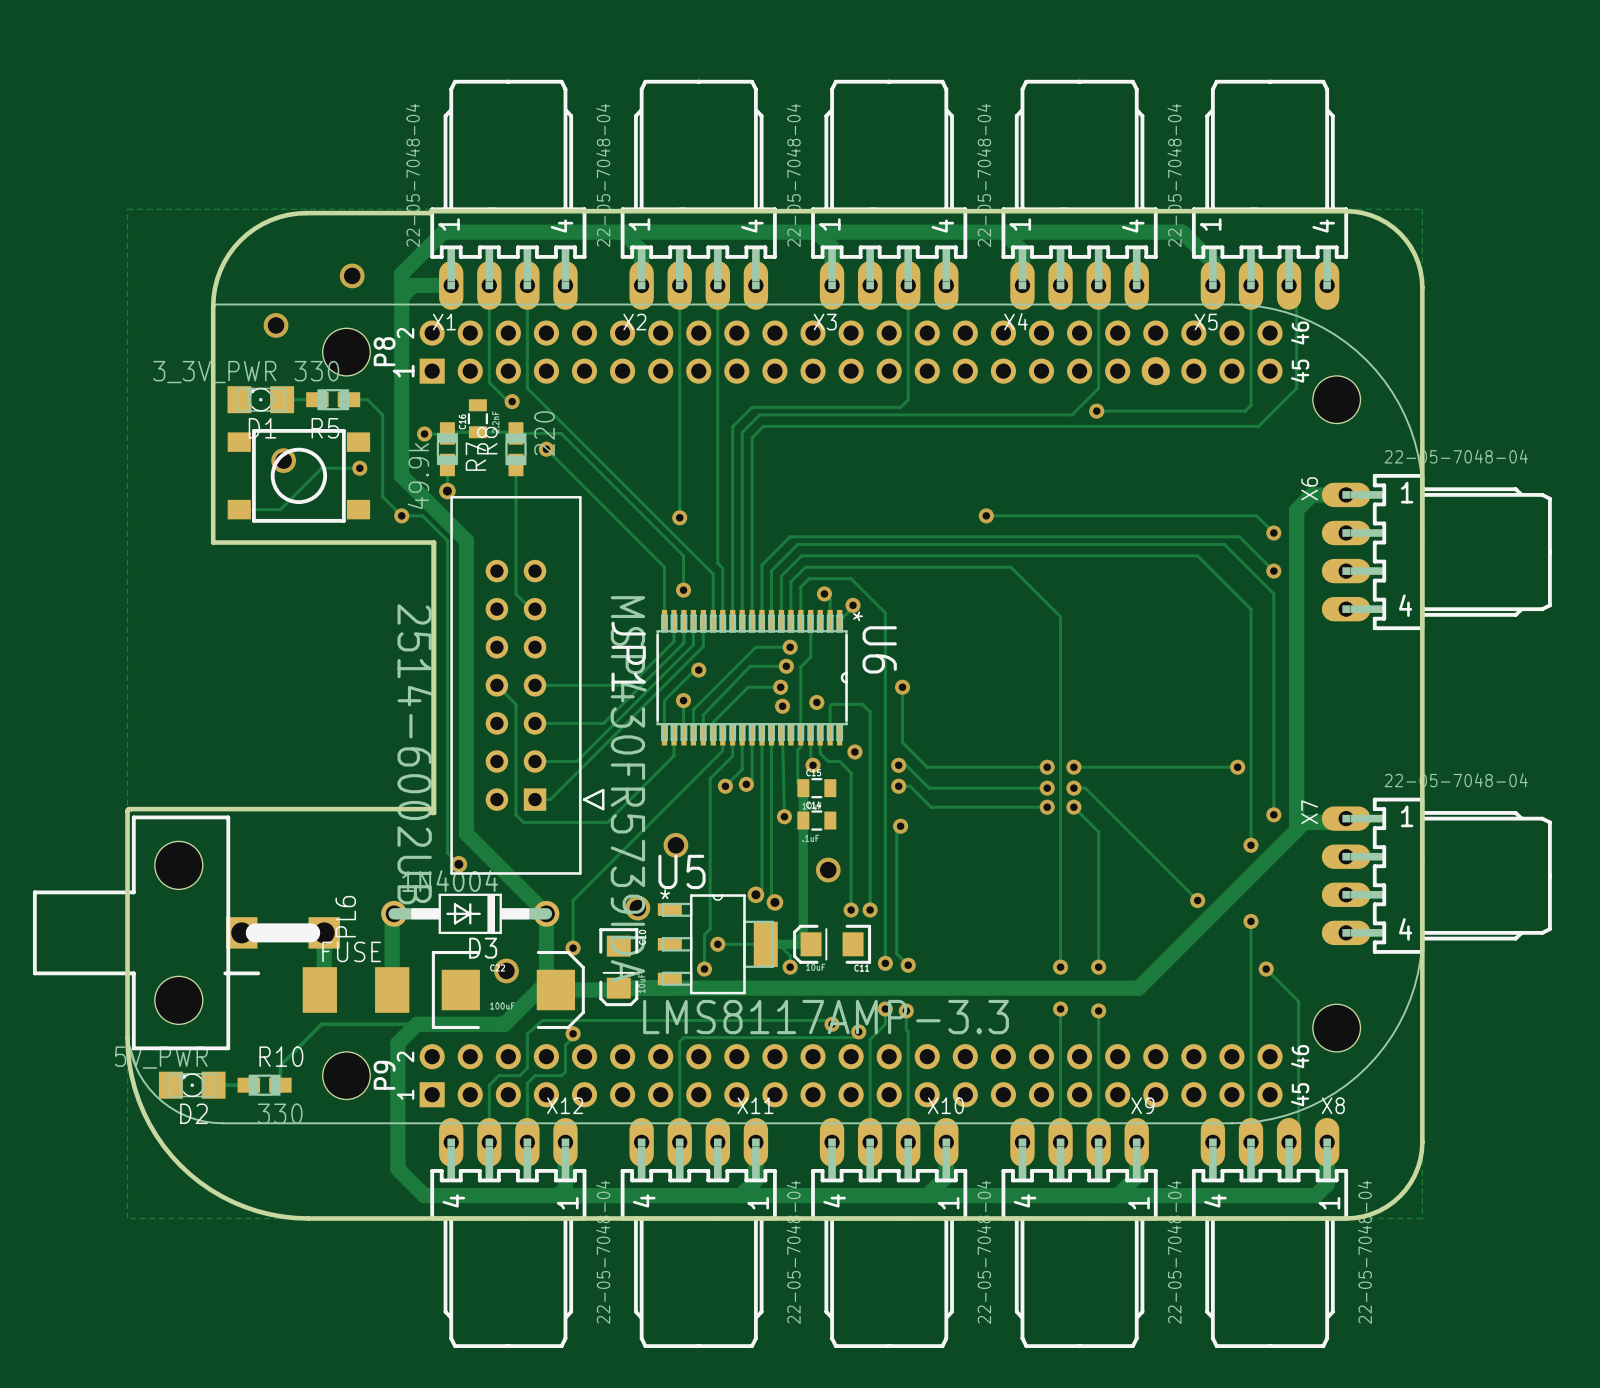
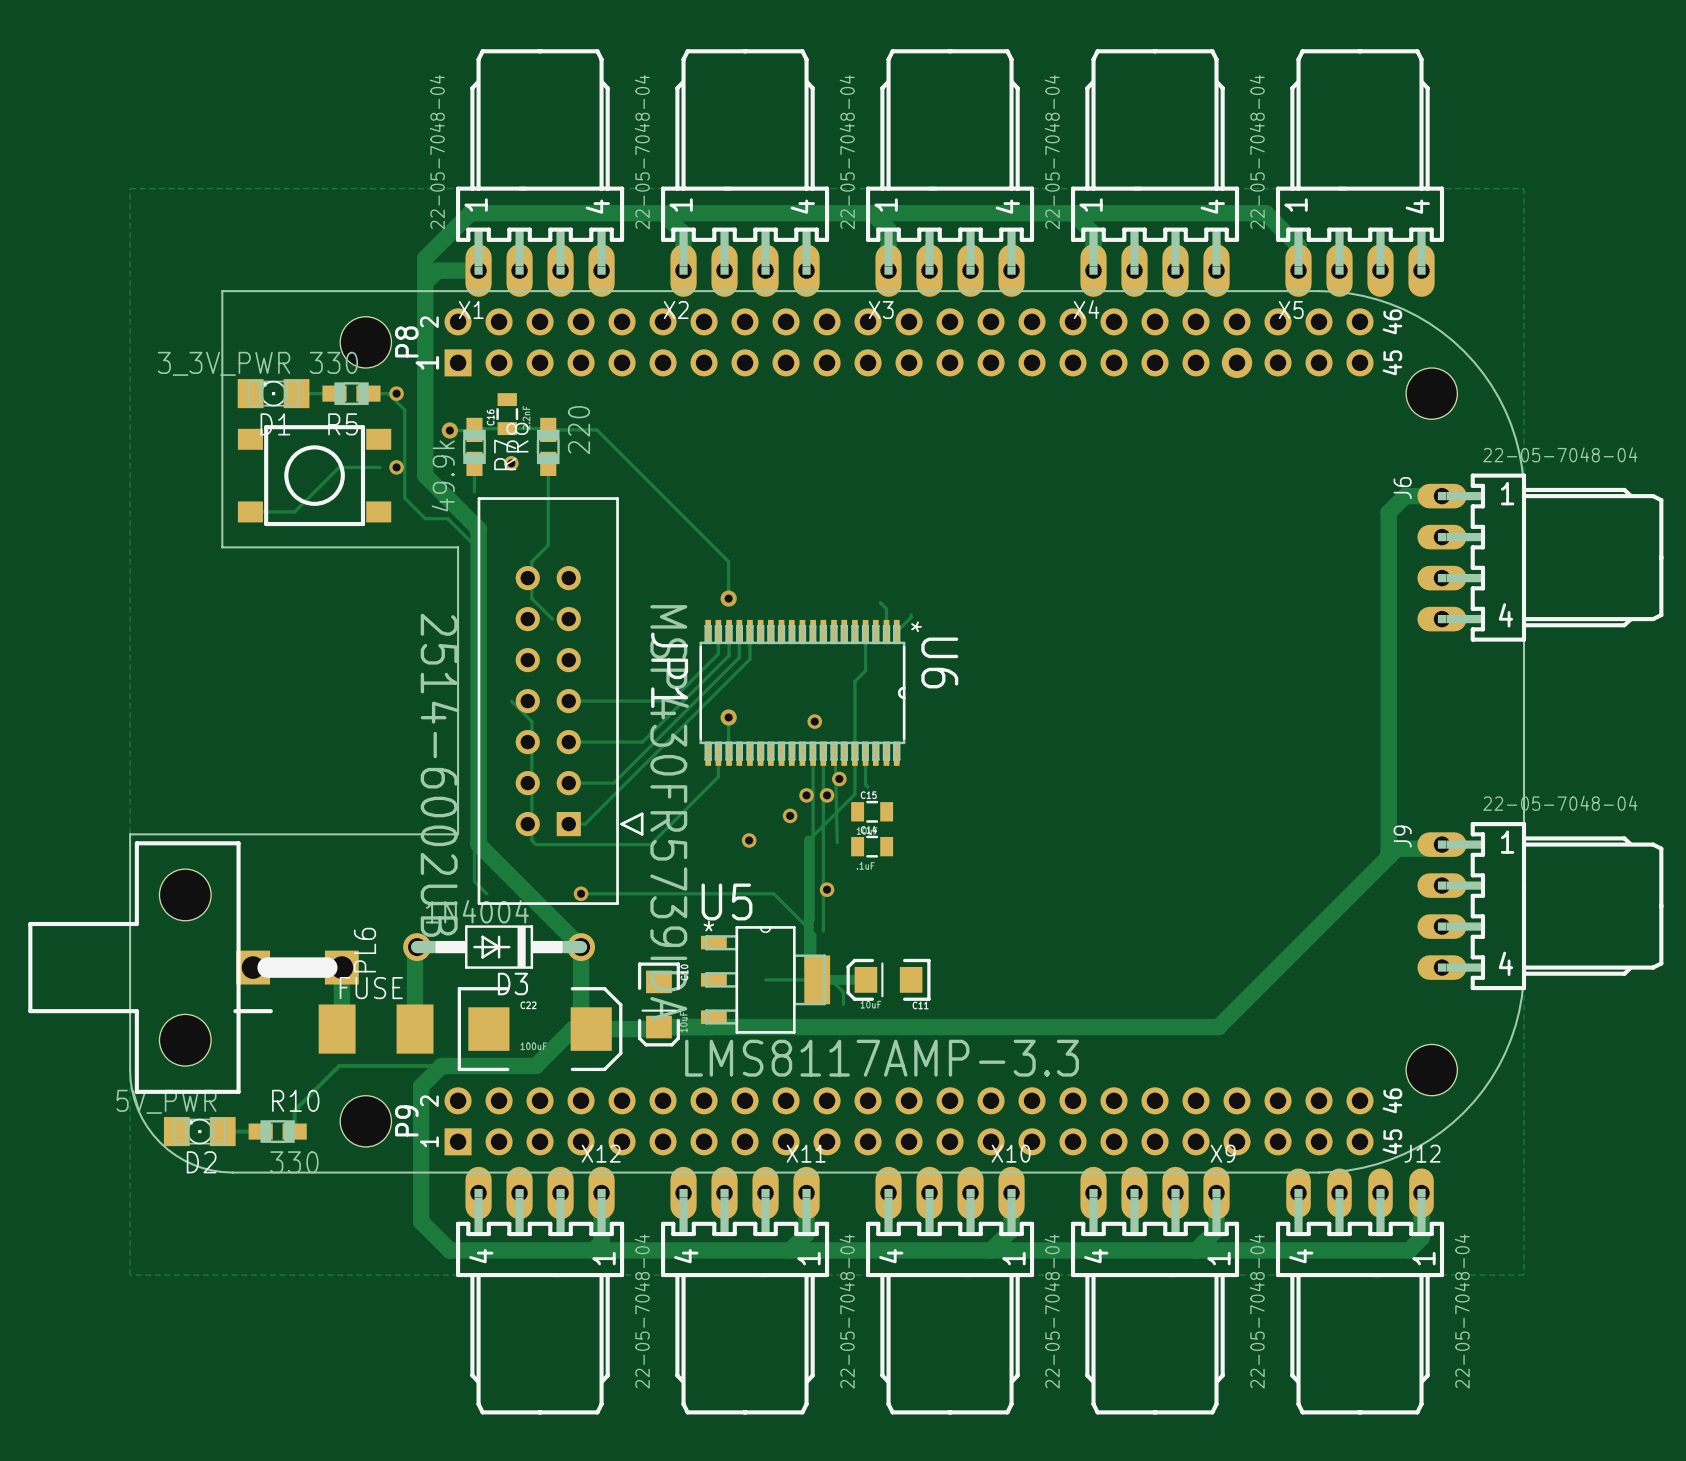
board edge: (432, 211) (1346, 211) (1363, 213) (1379, 218) (1400, 233) (1414, 254) (1420, 270) (1422, 287) (1422, 1142) (1420, 1159) (1414, 1175) (1400, 1196) (1379, 1210) (1363, 1216) (1346, 1218) (308, 1218) (269, 1214) (245, 1207) (210, 1189) (180, 1165) (163, 1146) (143, 1112) (134, 1088) (129, 1063) (127, 1037) (127, 809) (432, 809) (432, 812) (434, 812) (434, 542) (213, 542) (213, 306) (217, 279) (224, 262) (240, 240) (262, 224) (279, 217) (306, 213) (430, 213) (432, 211) -> none
via: (352, 275) -> none
track: (489, 285) (489, 382) (508, 401) (512, 401) -> none
track: (527, 285) (527, 388) (713, 574) (713, 620) -> none
track: (679, 285) (679, 517) -> none
track: (717, 285) (717, 563) (722, 568) (722, 620) -> none
track: (908, 285) (908, 399) (900, 407) (752, 407) (732, 426) (732, 620) -> none
track: (1098, 285) (1098, 388) (1071, 414) (759, 414) (742, 432) (742, 620) -> none
track: (1250, 285) (1250, 405) (1245, 411) (1096, 411) -> none
track: (1289, 285) (1296, 293) (1296, 388) (1258, 426) (763, 426) (752, 437) (752, 620) -> none
via: (276, 325) -> none
via: none -> (396, 393)
via: (512, 401) -> none
via: (1096, 411) -> none
track: (546, 449) (664, 567) (664, 620) -> none
via: (546, 449) -> none
via: (283, 460) -> none
via: none -> (511, 463)
via: (359, 468) -> none
via: none -> (396, 467)
via: (447, 491) -> none
via: (401, 515) -> none
track: (986, 515) (1256, 515) (1273, 533) -> none
via: (986, 515) -> none
via: (679, 517) -> none
track: (451, 525) (466, 540) (466, 833) -> (478, 528) (478, 844) (494, 860)
via: (1273, 533) -> none
track: (515, 540) (515, 593) (531, 609) (535, 609) -> (548, 545) (531, 561) (531, 598) (552, 619)
X6: 22-05-7048-04 (1436, 552) -> none
J6: none -> 22-05-7048-04 (1540, 557)
track: (1273, 571) (1239, 536) (790, 536) (761, 564) (761, 620) -> none
via: (1273, 571) -> none
via: (824, 593) -> none
via: (853, 605) -> none
track: (771, 620) (771, 570) (797, 544) (1224, 544) (1273, 593) (1273, 814) -> none
track: (781, 620) (781, 576) (801, 555) (1197, 555) (1250, 609) (1250, 845) -> none
track: (790, 620) (790, 581) (805, 567) (1011, 567) (1060, 616) (1060, 967) -> none
track: (800, 620) (800, 587) (809, 578) (851, 578) (885, 612) (885, 963) -> none
track: (790, 647) (755, 647) (693, 709) (693, 734) -> none
via: (790, 647) -> none
track: (786, 666) (750, 666) (703, 715) (703, 734) -> none
via: (786, 666) -> none
track: (698, 670) (694, 670) (664, 700) (664, 734) -> none
via: (698, 670) -> none
track: (496, 685) (515, 704) (515, 814) (523, 822) (607, 822) (611, 818) -> (511, 701) (531, 721) (531, 840) (535, 844) (650, 844)
track: (780, 687) (748, 687) (713, 722) (713, 734) -> none
via: (780, 687) -> none
track: (902, 687) (902, 742) (927, 767) (1047, 767) -> none
via: (902, 687) -> none
via: (816, 702) -> none
via: none -> (814, 721)
via: (782, 706) -> none
track: (722, 734) (722, 750) (573, 900) (573, 948) -> none
track: (732, 734) (732, 756) (710, 778) (710, 929) (704, 934) (704, 969) -> none
track: (742, 734) (742, 769) (725, 786) -> none
track: (752, 734) (752, 778) (746, 784) -> none
track: (820, 734) (820, 753) (828, 761) (839, 761) (851, 772) (851, 910) -> none
track: (830, 734) (830, 706) (832, 704) (862, 704) (870, 711) (870, 910) -> none
track: (800, 747) (797, 750) (797, 782) (803, 788) -> (854, 767) (854, 794) (808, 840) (808, 971) (817, 979) (814, 977) (814, 934) (773, 893) (581, 893)
via: (854, 751) -> none
via: none -> (839, 778)
via: (813, 765) -> none
track: (898, 765) (906, 765) (929, 788) (1047, 788) -> none
via: (898, 765) -> none
via: (1047, 767) -> none
track: (1073, 767) (1237, 767) -> none
via: (1073, 767) -> none
via: (1237, 767) -> none
via: none -> (806, 795)
via: none -> (827, 795)
via: (746, 784) -> none
via: (725, 786) -> none
track: (898, 786) (910, 786) (931, 807) (1047, 807) -> none
via: (898, 786) -> none
track: (803, 788) (803, 934) (793, 944) -> none
via: (1047, 788) -> none
track: (1073, 788) (1085, 788) (1197, 900) -> none
via: (1073, 788) -> none
via: none -> (790, 815)
via: (1047, 807) -> none
track: (1073, 807) (1098, 831) (1098, 967) -> none
via: (1073, 807) -> none
via: none -> (749, 840)
via: (1273, 814) -> none
via: (784, 816) -> none
track: (900, 826) (896, 831) (896, 953) (908, 965) -> none
via: (900, 826) -> none
via: (675, 845) -> none
via: (1250, 845) -> none
via: none -> (827, 889)
via: (458, 864) -> none
via: none -> (581, 893)
via: (828, 870) -> none
X7: 22-05-7048-04 (1436, 875) -> none
J9: none -> 22-05-7048-04 (1540, 906)
via: (755, 894) -> none
via: (1197, 900) -> none
via: (774, 902) -> none
via: (637, 908) -> none
via: (851, 910) -> none
via: (870, 910) -> none
track: (1250, 921) (1250, 1142) -> none
via: (1250, 921) -> none
via: (717, 944) -> none
via: (573, 948) -> none
via: (885, 963) -> none
via: (908, 965) -> none
via: (790, 967) -> none
via: (1060, 967) -> none
via: (1098, 967) -> none
via: (704, 969) -> none
track: (1266, 969) (1298, 1001) (1298, 1138) (1294, 1142) (1289, 1142) -> none
via: (1266, 969) -> none
via: (506, 970) -> none
track: (885, 1009) (885, 1024) (870, 1039) (870, 1142) -> none
via: (885, 1009) -> none
track: (1060, 1009) (1060, 1142) -> none
via: (1060, 1009) -> none
track: (906, 1010) (906, 1029) (908, 1031) (908, 1142) -> none
via: (906, 1010) -> none
track: (1098, 1010) (1098, 1142) -> none
via: (1098, 1010) -> none
track: (832, 1024) (828, 1020) (542, 1020) (527, 1033) (527, 1068) (519, 1075) (498, 1075) (489, 1085) (489, 1142) -> none
via: (832, 1024) -> none
track: (858, 1031) (853, 1037) (683, 1037) (679, 1041) (679, 1142) -> none
via: (858, 1031) -> none
track: (573, 1033) (573, 1037) (565, 1045) (565, 1071) (561, 1075) (535, 1075) (527, 1083) (527, 1142) -> none
via: (573, 1033) -> none
X8: 22-05-7048-04 (1270, 1232) -> none
J12: none -> 22-05-7048-04 (1360, 1291)

